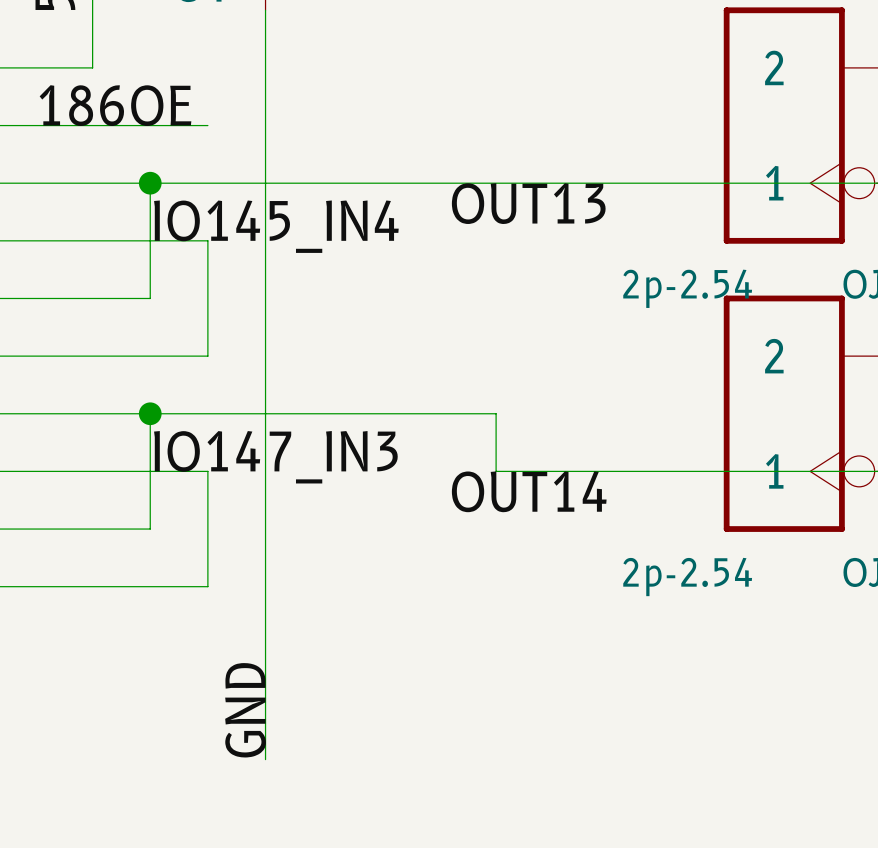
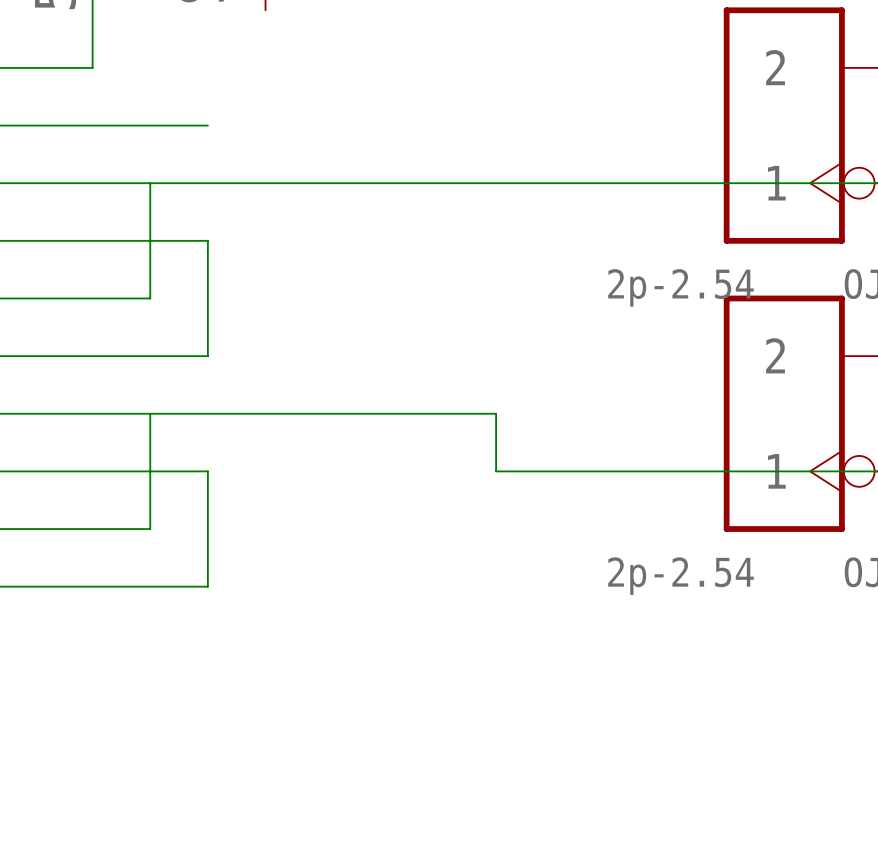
wire: (265, 10) (265, 759) -> none
label: 186OE (115, 105) -> none
junction: (150, 183) -> none
label: OUT13 (528, 203) -> none
label: IO145_IN4 (276, 226) -> none
junction: (150, 413) -> none
label: IO147_IN3 (275, 457) -> none
label: OUT14 (529, 491) -> none
label: GND (245, 710) -> none

